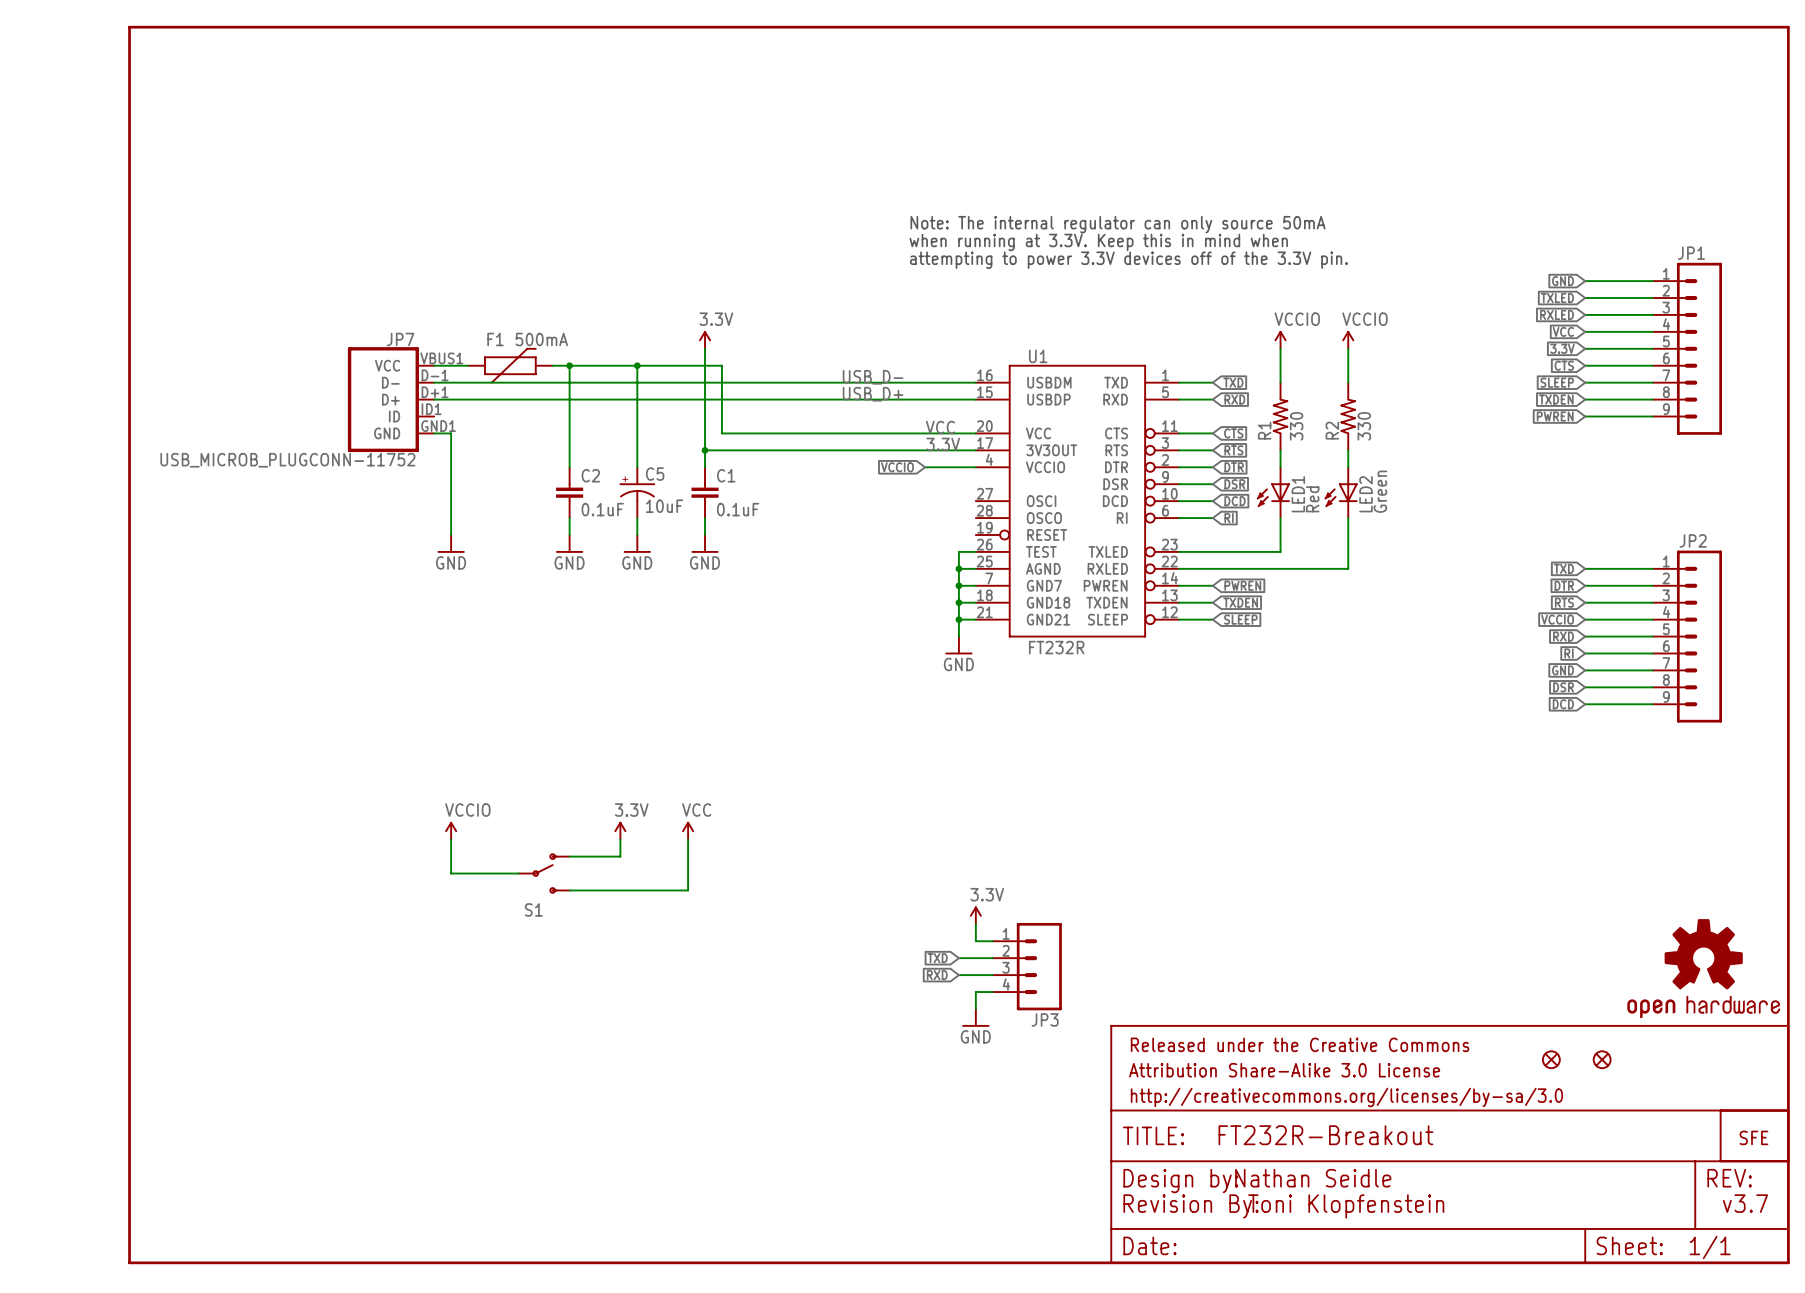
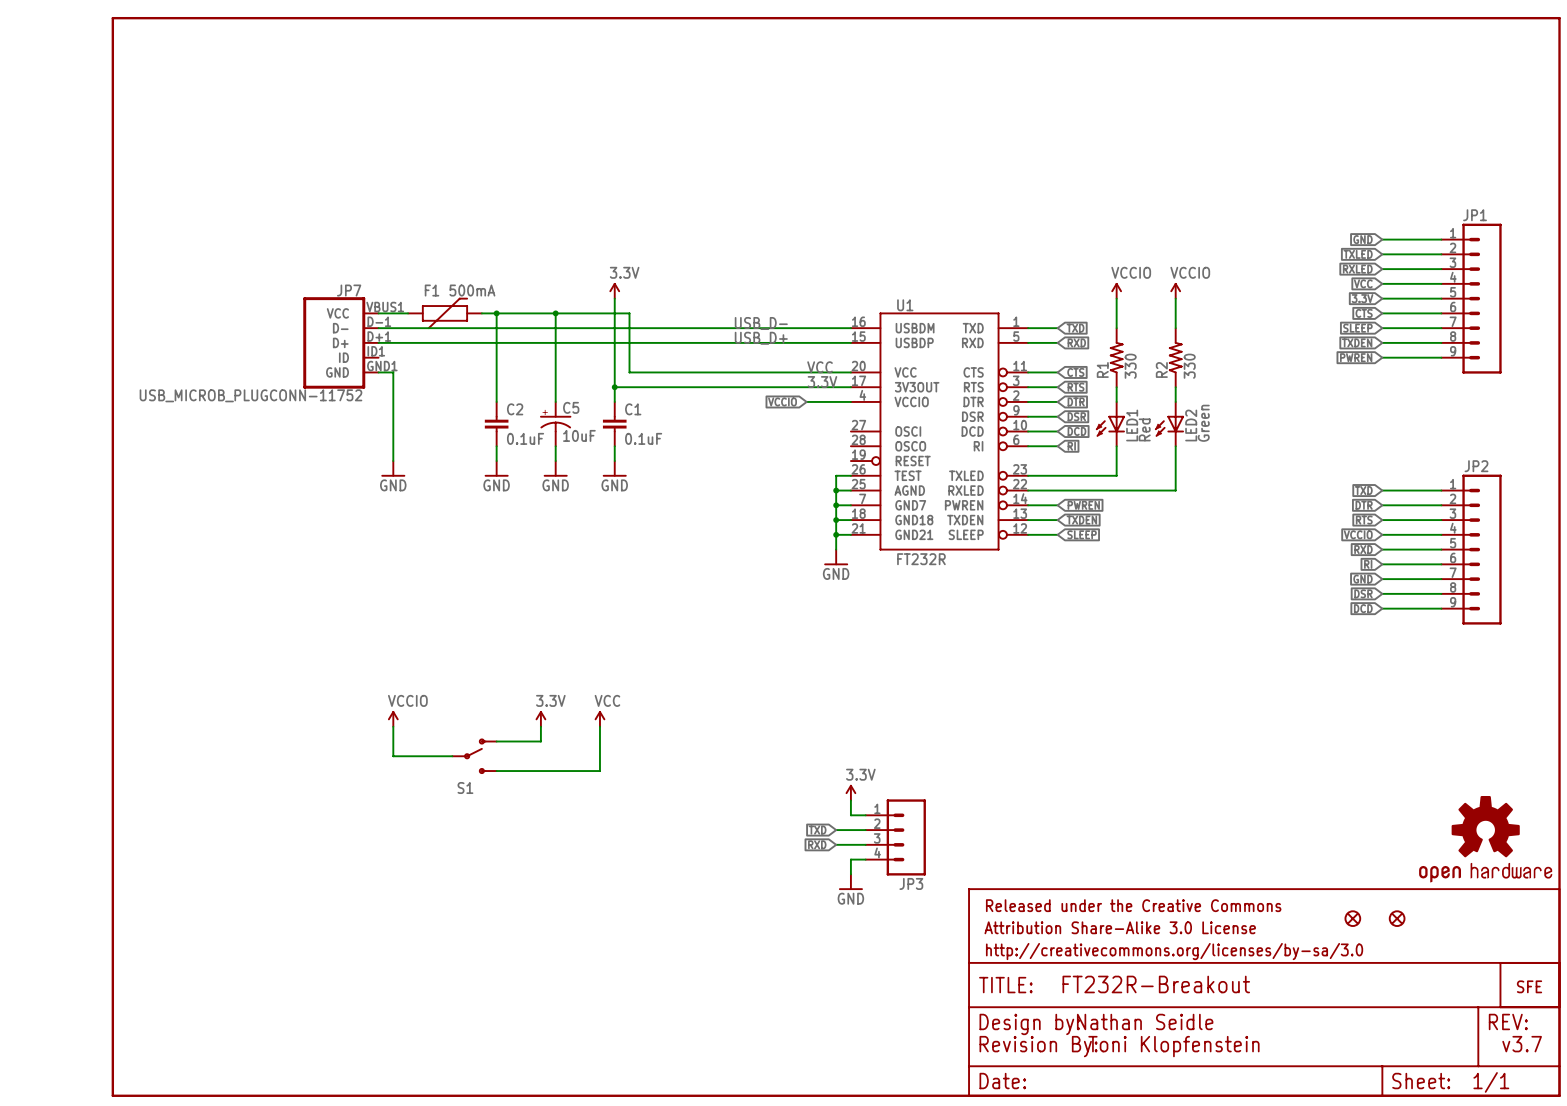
text: Note: The internal regulator can only source 50mA (1117, 224) -> none
text: when running at 3.3V. Keep this in mind when (1098, 242) -> none
text: attempting to power 3.3V devices off of the 3.3V pin. (1128, 260) -> none

